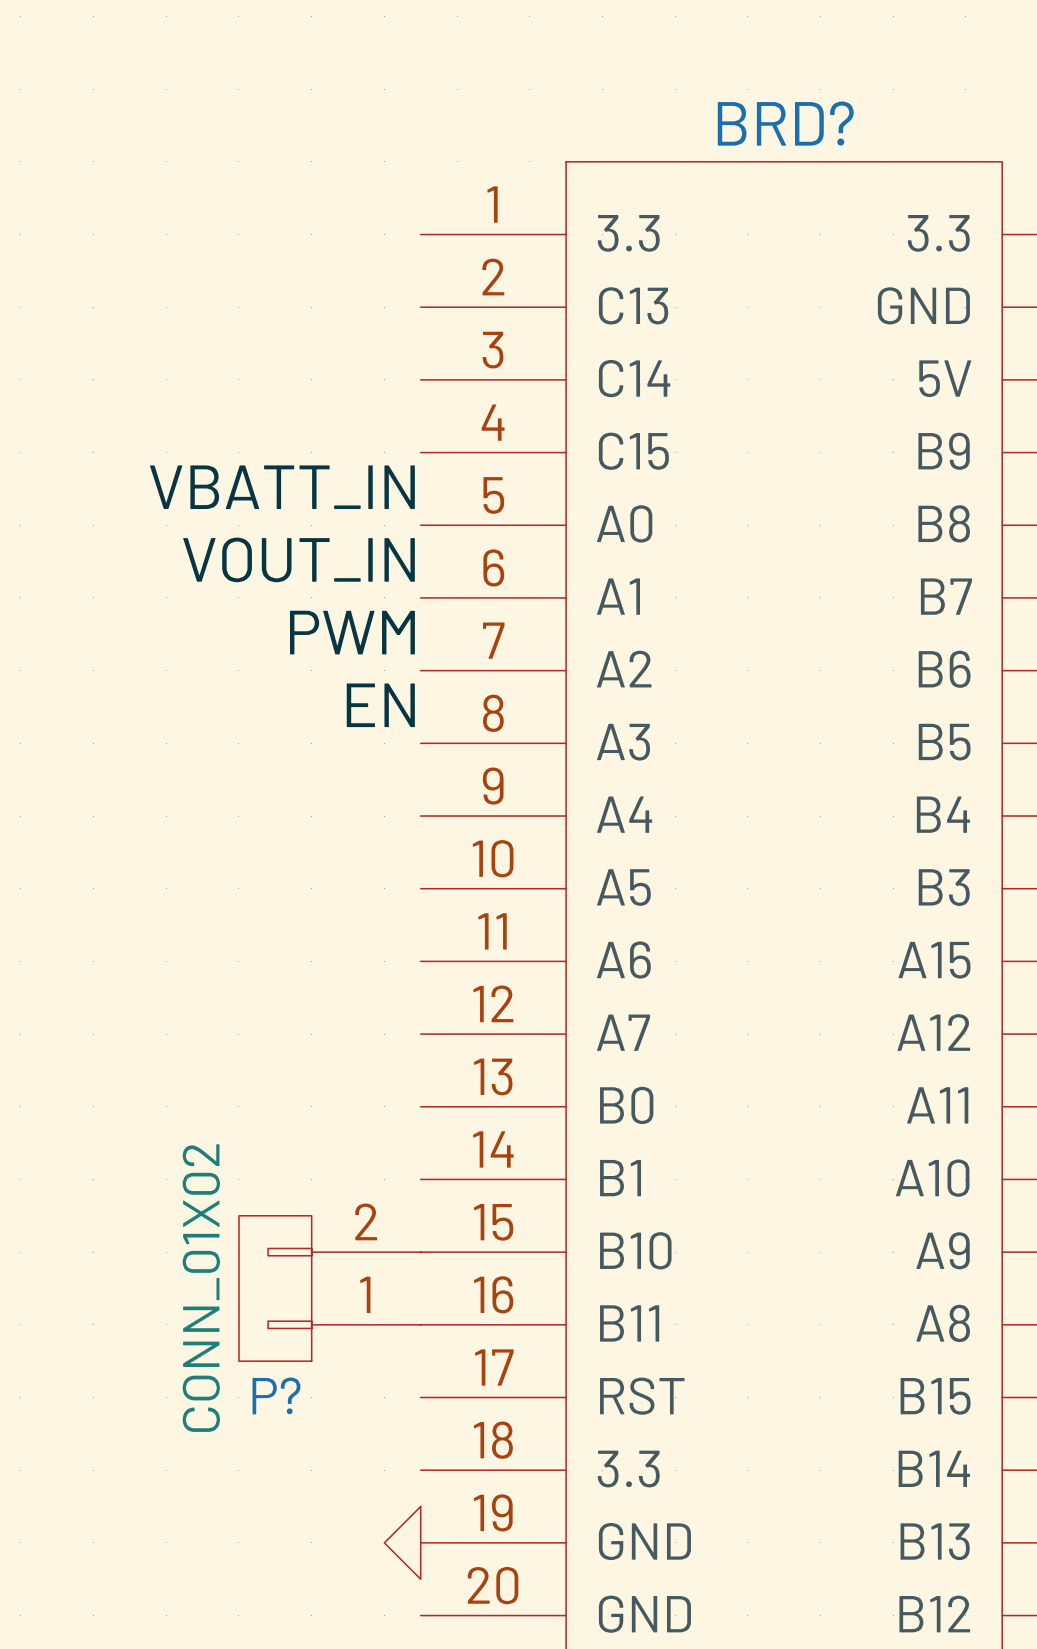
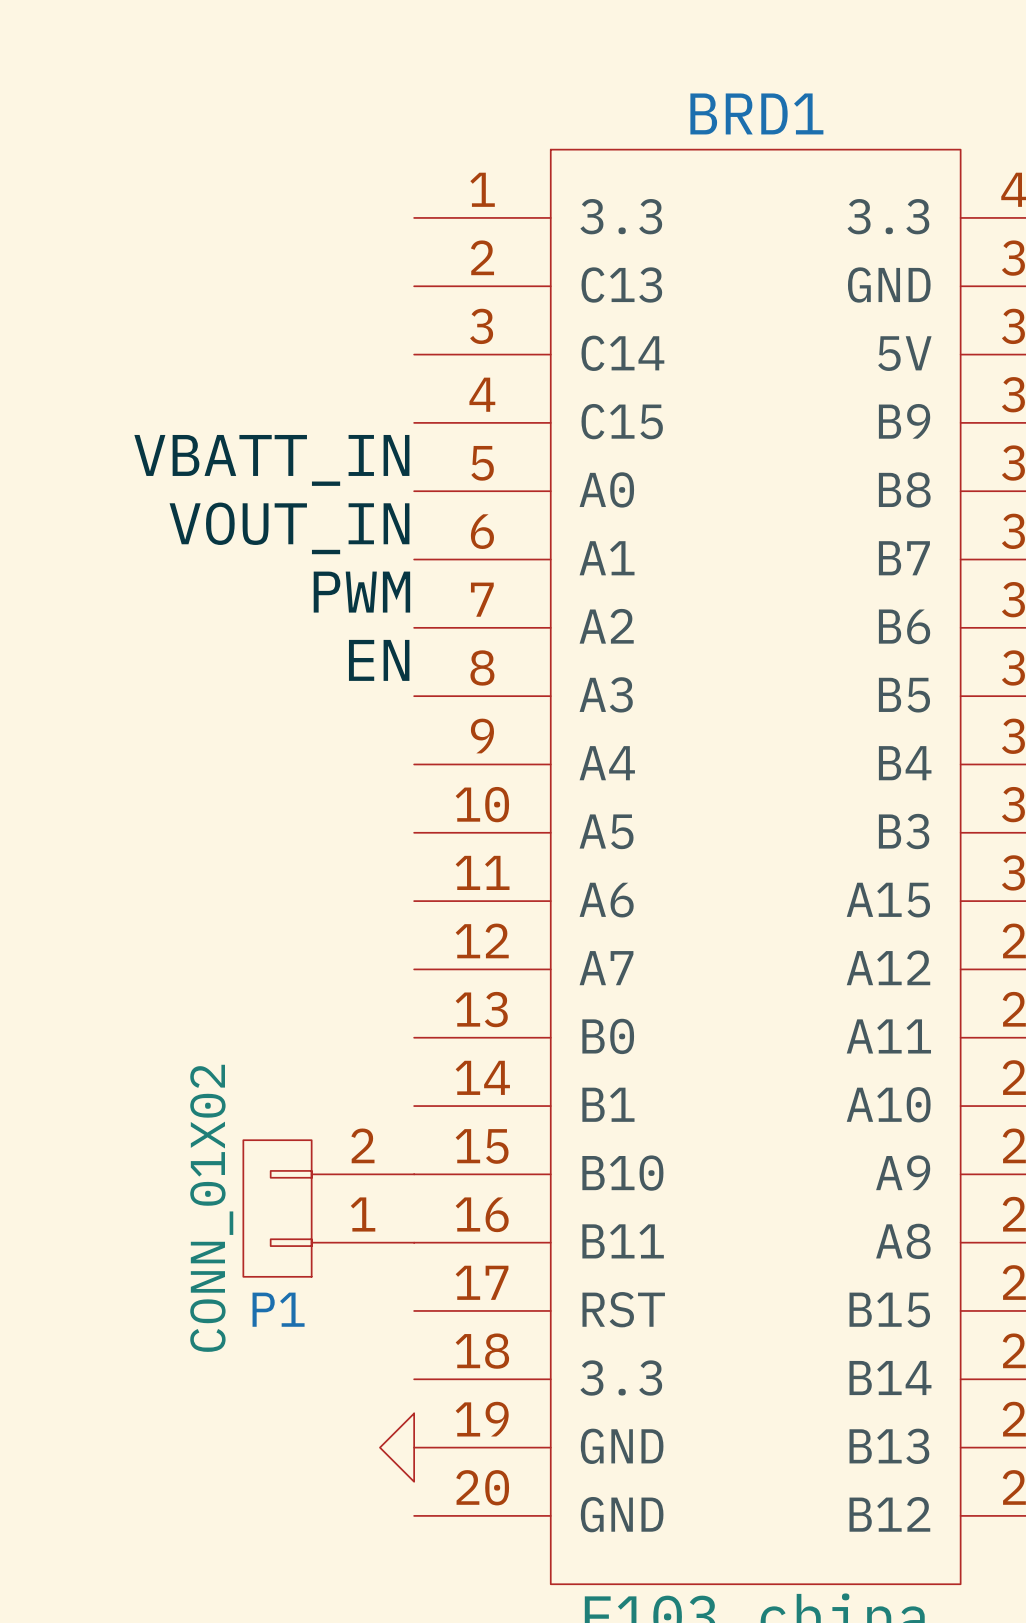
BRD? name: BRD? (785, 123) -> BRD1 (756, 113)
P? name: P? (276, 1395) -> P1 (278, 1309)

